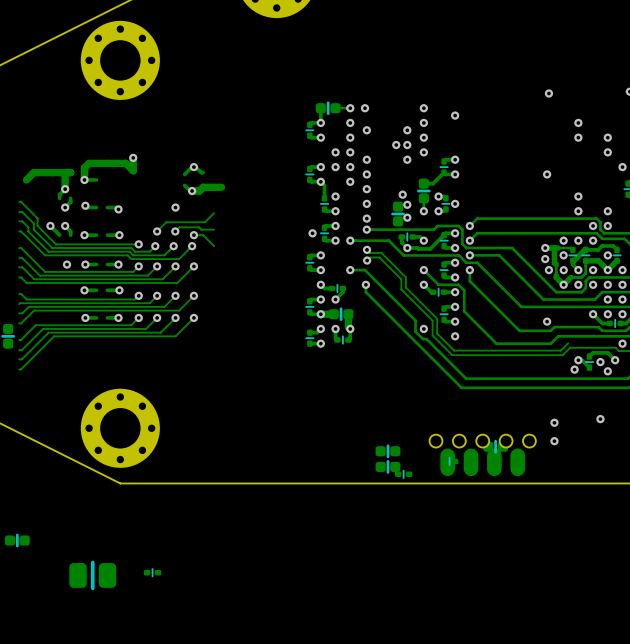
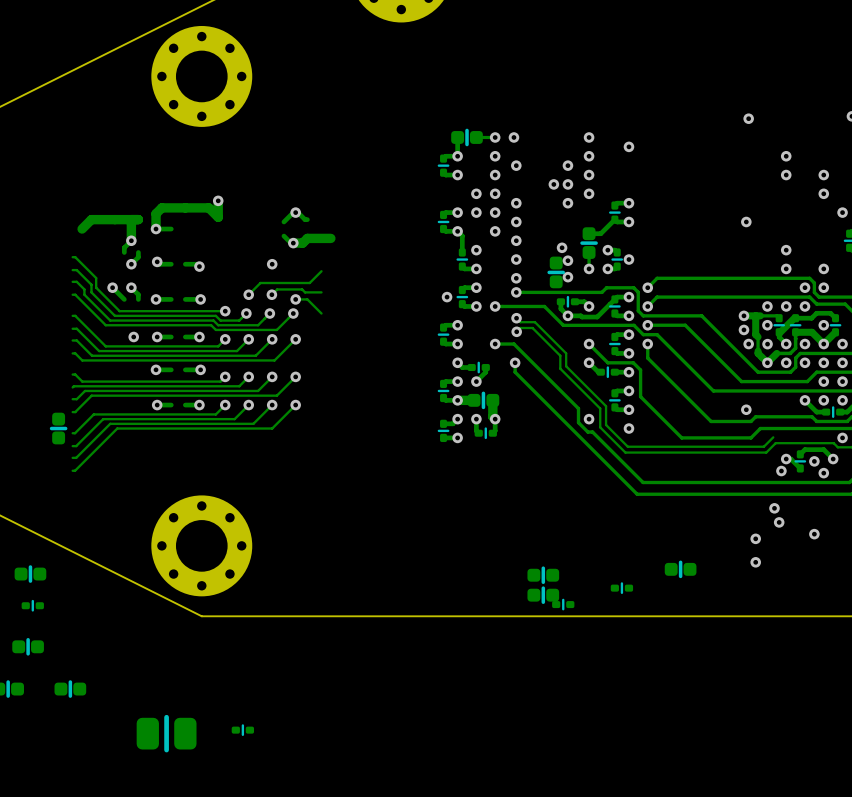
via: none -> (774, 508)
via: none -> (779, 522)
part: (482, 455) -> none

